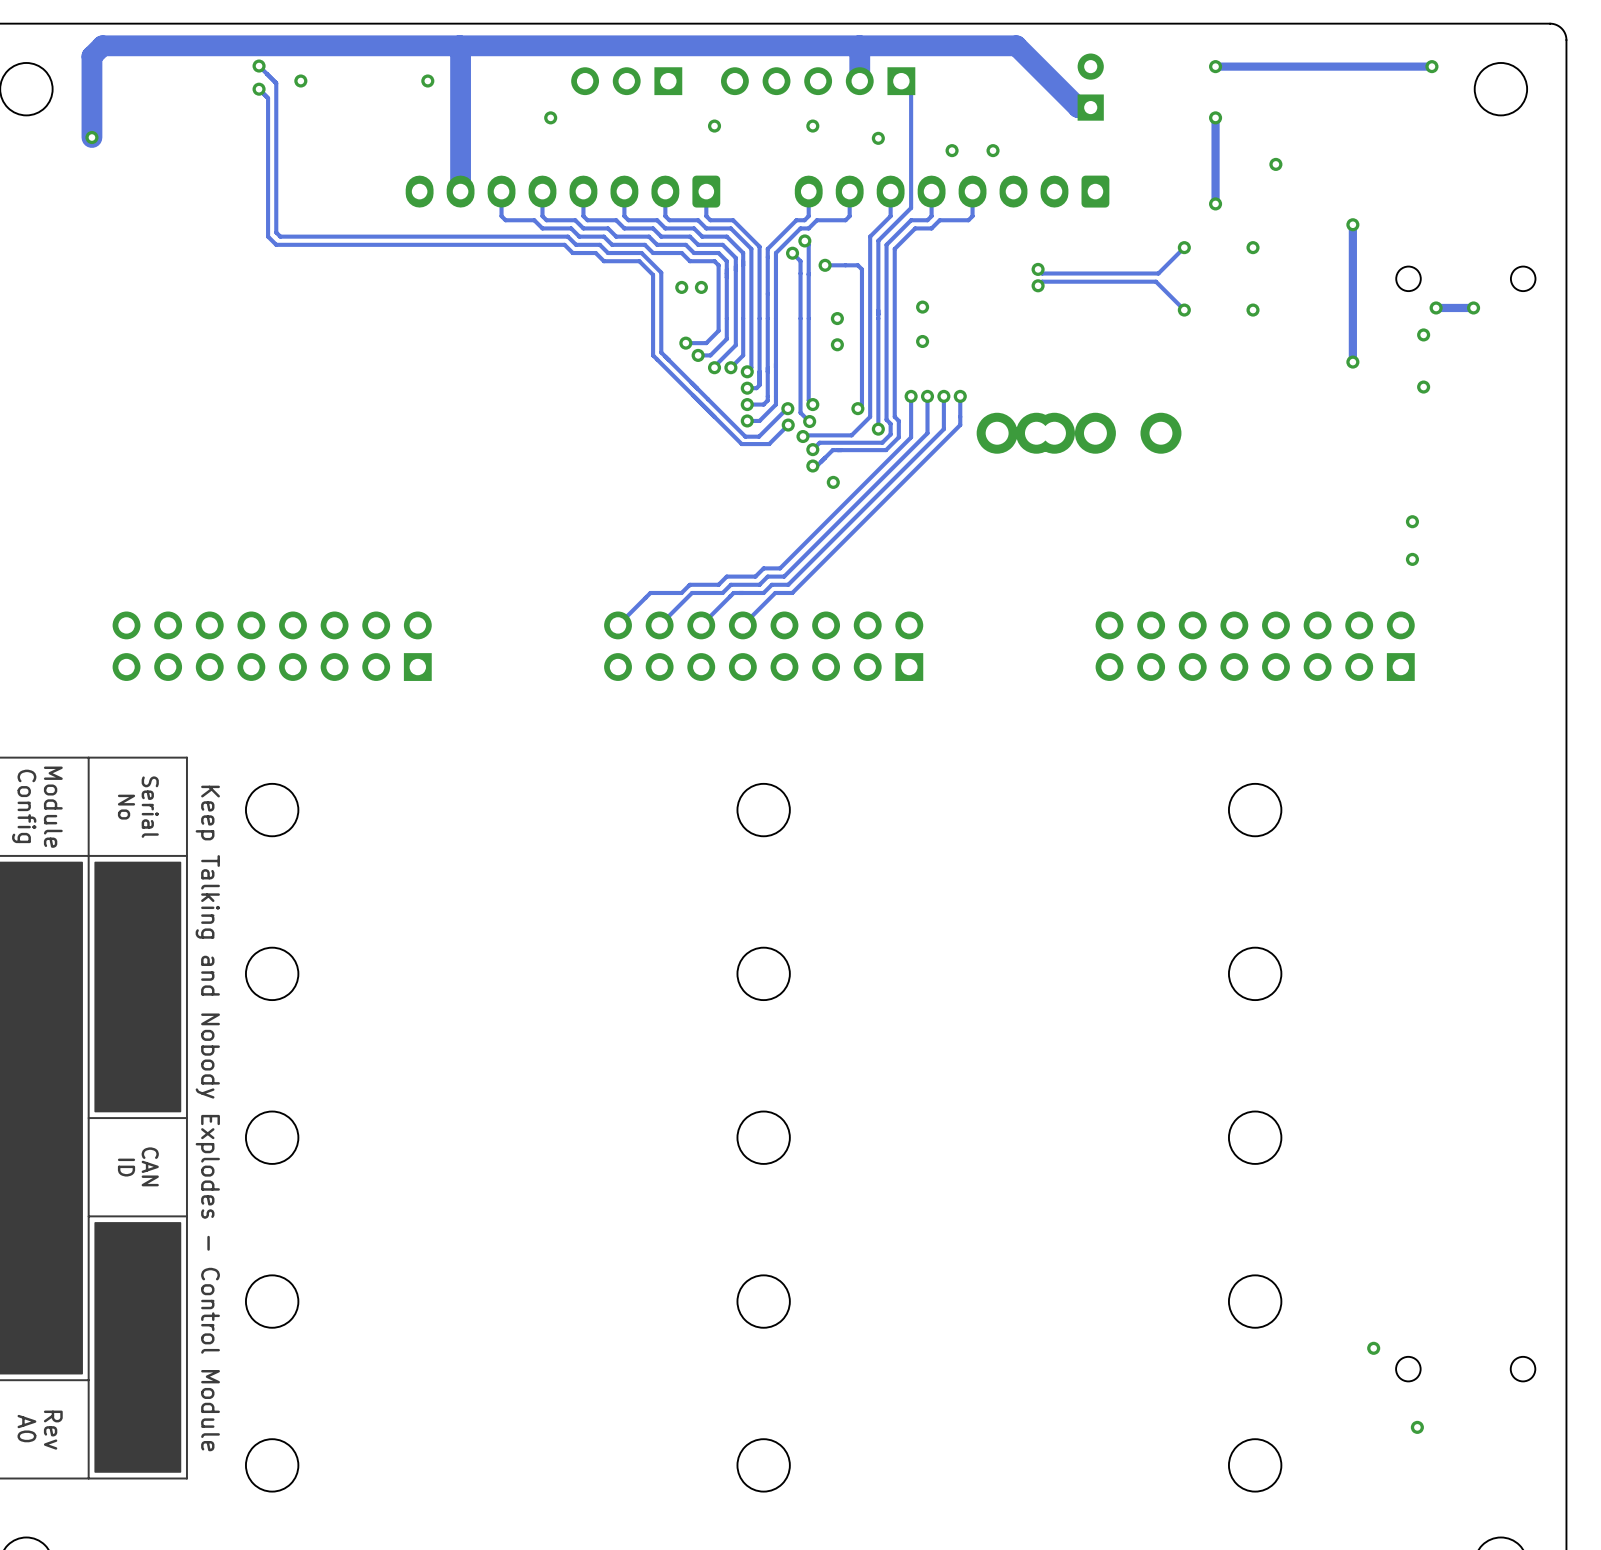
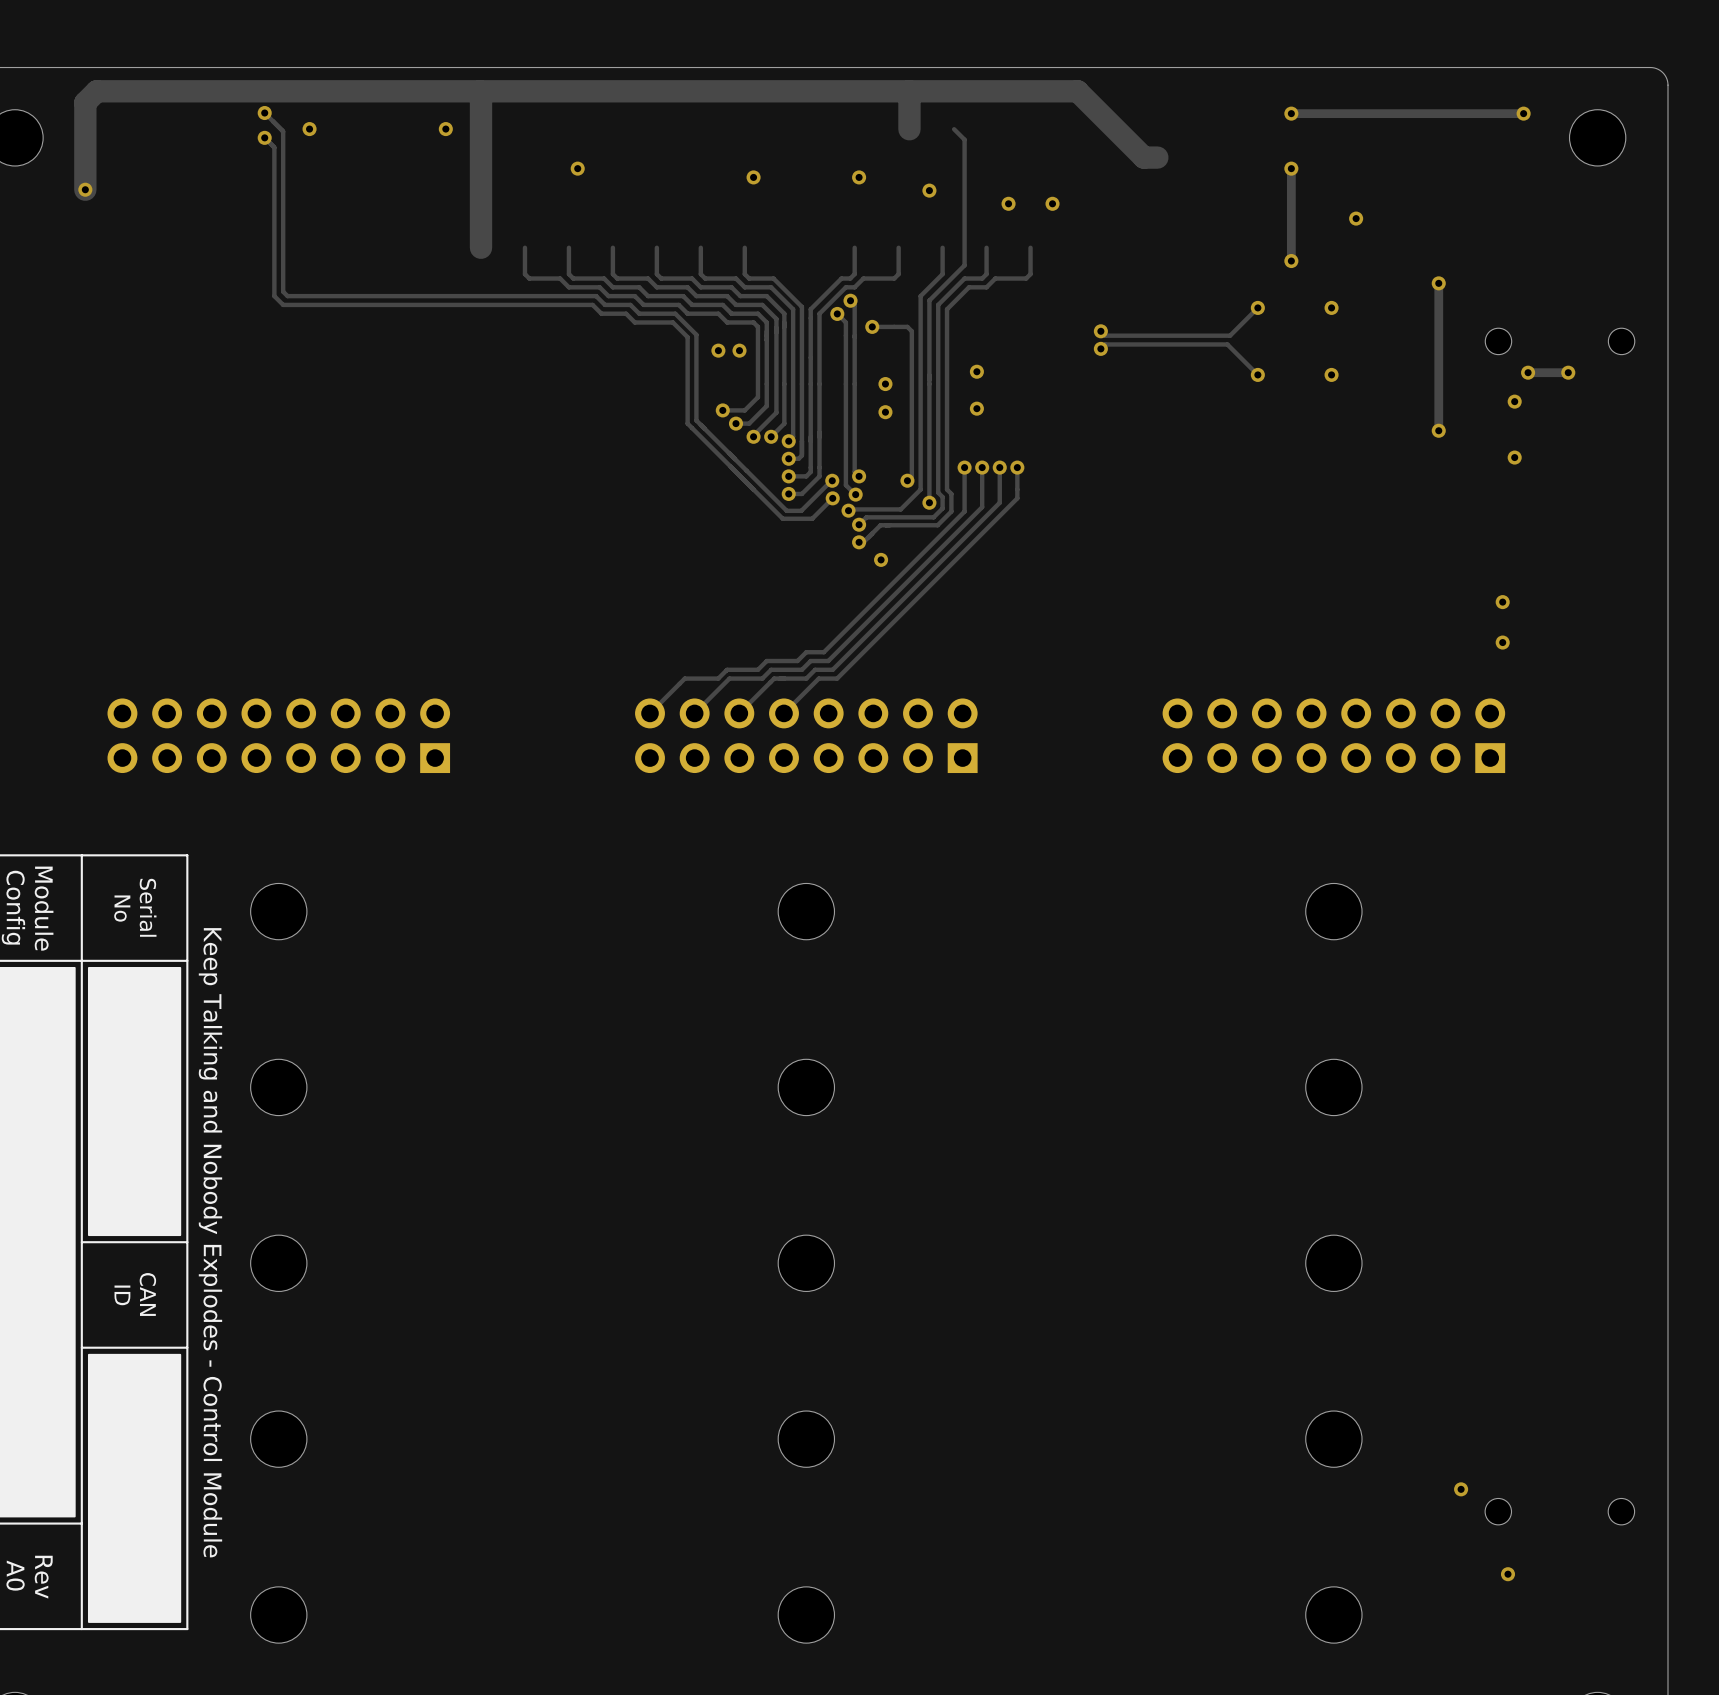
part: (626, 81) -> none
part: (818, 81) -> none
part: (1090, 87) -> none
part: (562, 191) -> none
part: (952, 191) -> none
part: (1079, 433) -> none

